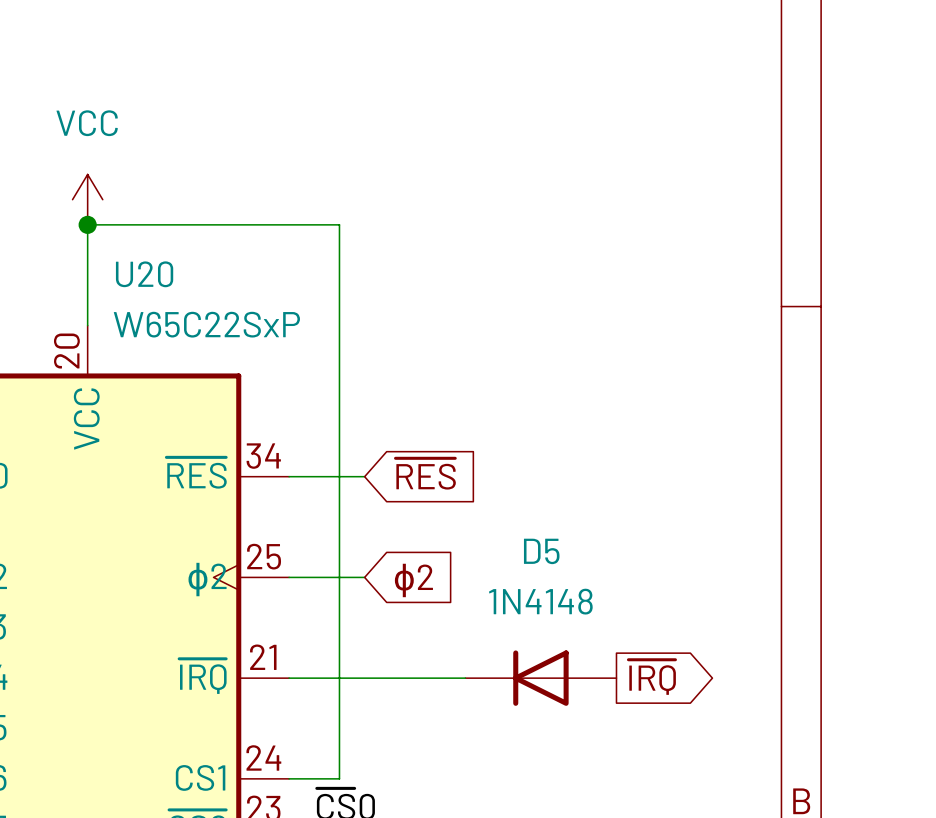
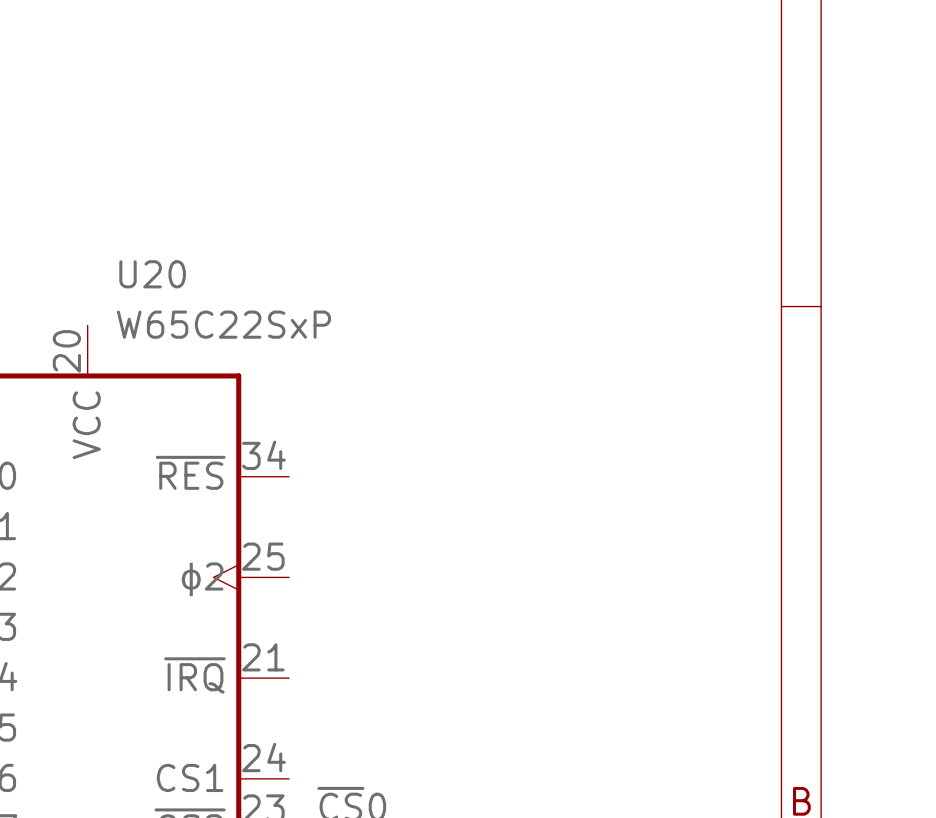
power symbol: VCC (87, 199) -> none
junction: (87, 224) -> none
wire: (87, 325) (87, 224) (339, 224) (339, 778) (289, 778) -> none
global label: ~{RES} (425, 473) -> none
wire: (289, 476) (364, 476) -> none
wire: (289, 577) (364, 577) -> none
global label: ϕ2 (413, 580) -> none
global label: ~{IRQ} (652, 677) -> none
wire: (289, 678) (465, 678) -> none
D5: 1N4148 (540, 678) -> none

